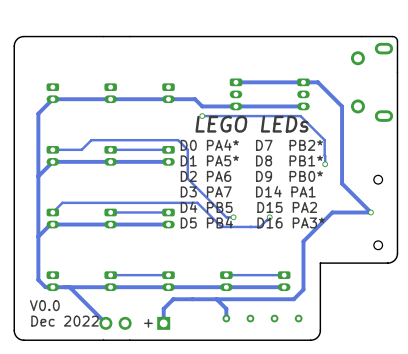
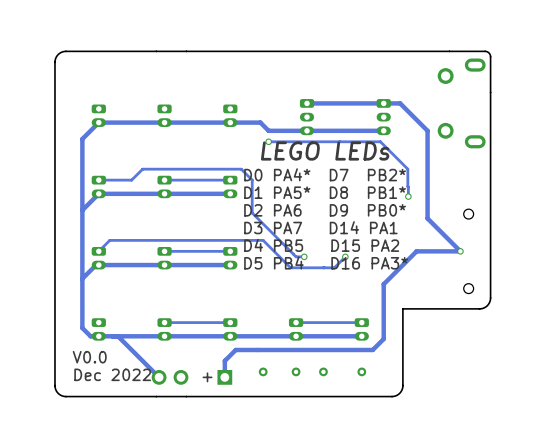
track: (216, 299) (226, 308) (226, 318) -> none
part: none -> (263, 371)
part: (274, 318) -> none
part: none -> (361, 371)
part: (298, 318) -> none

